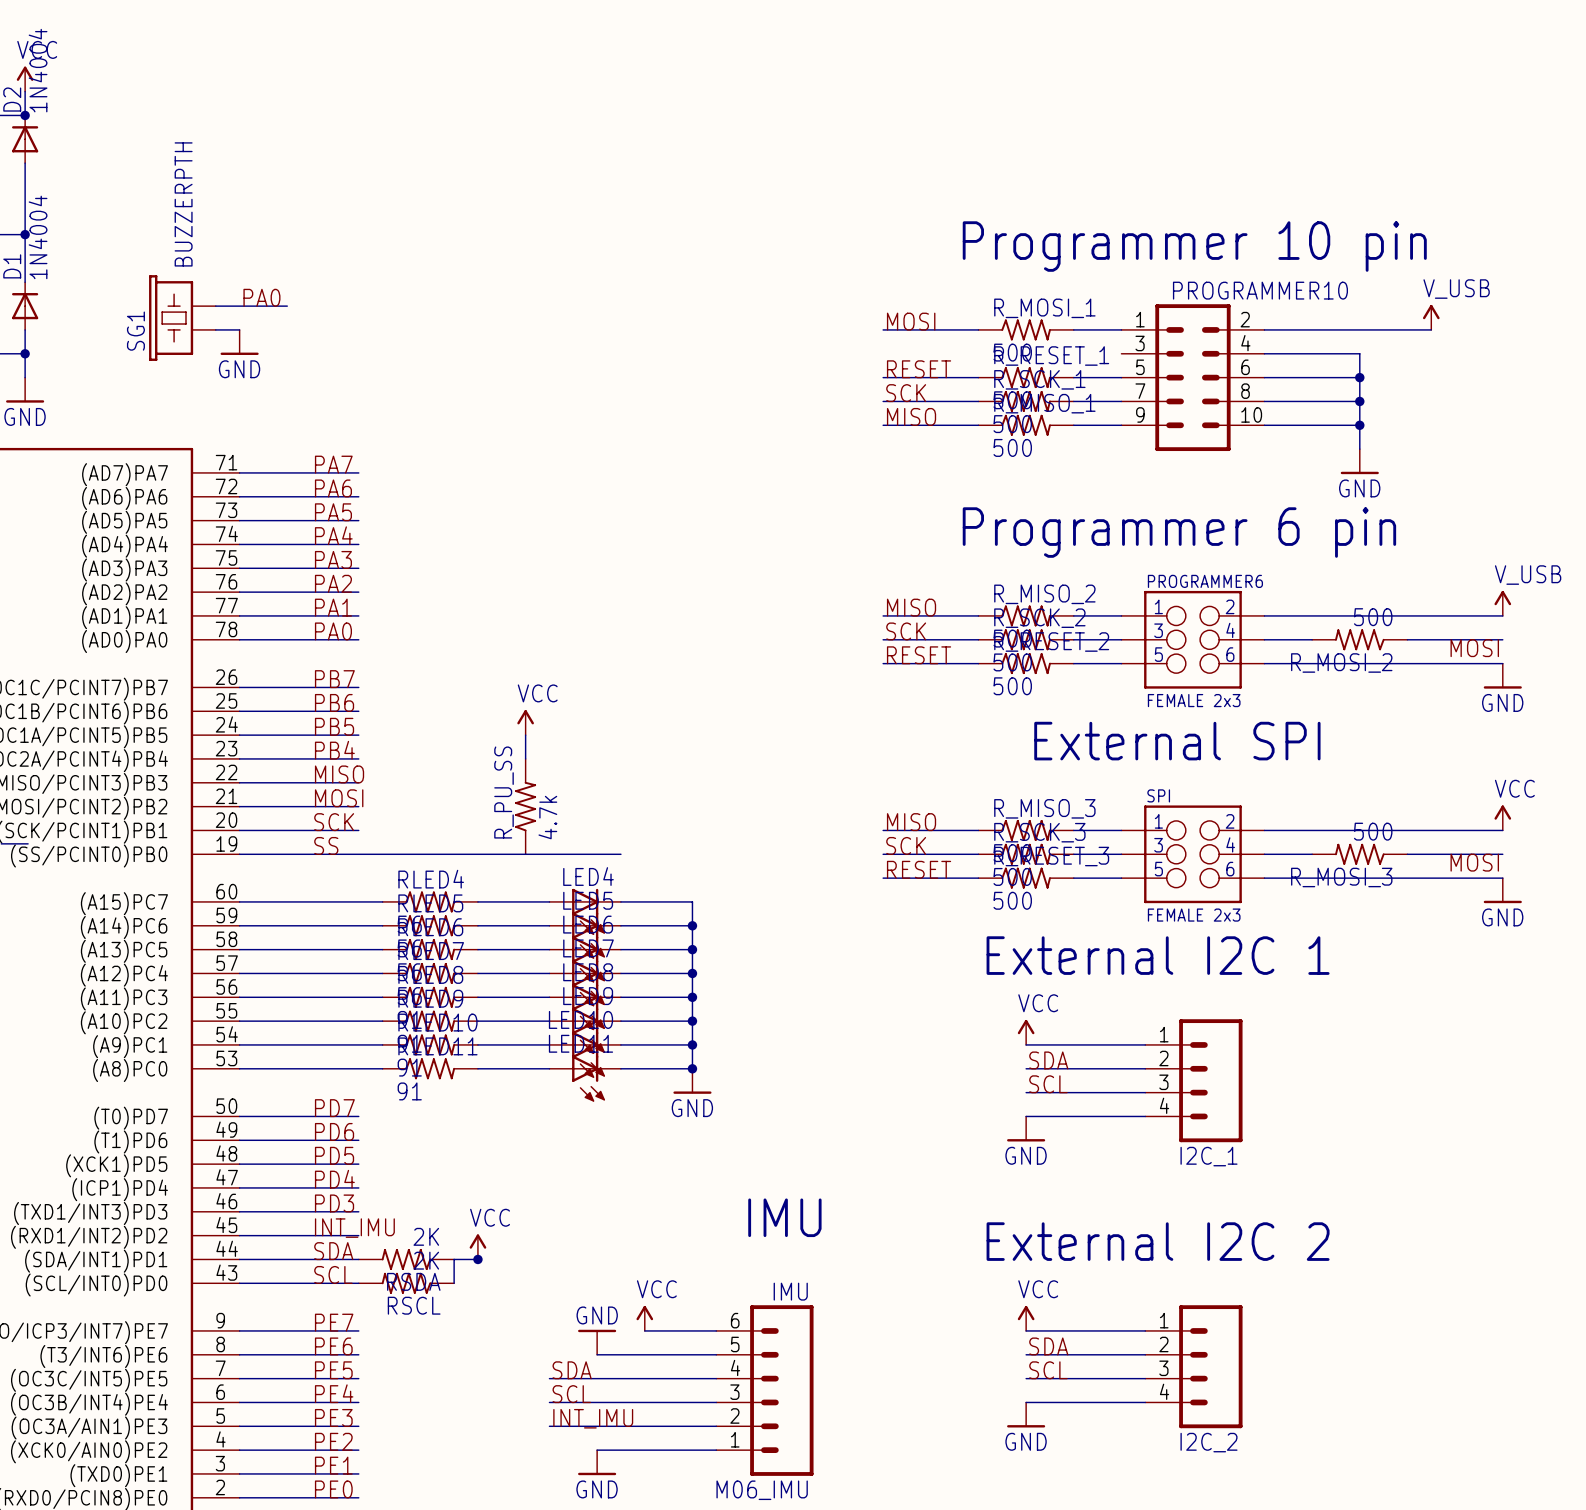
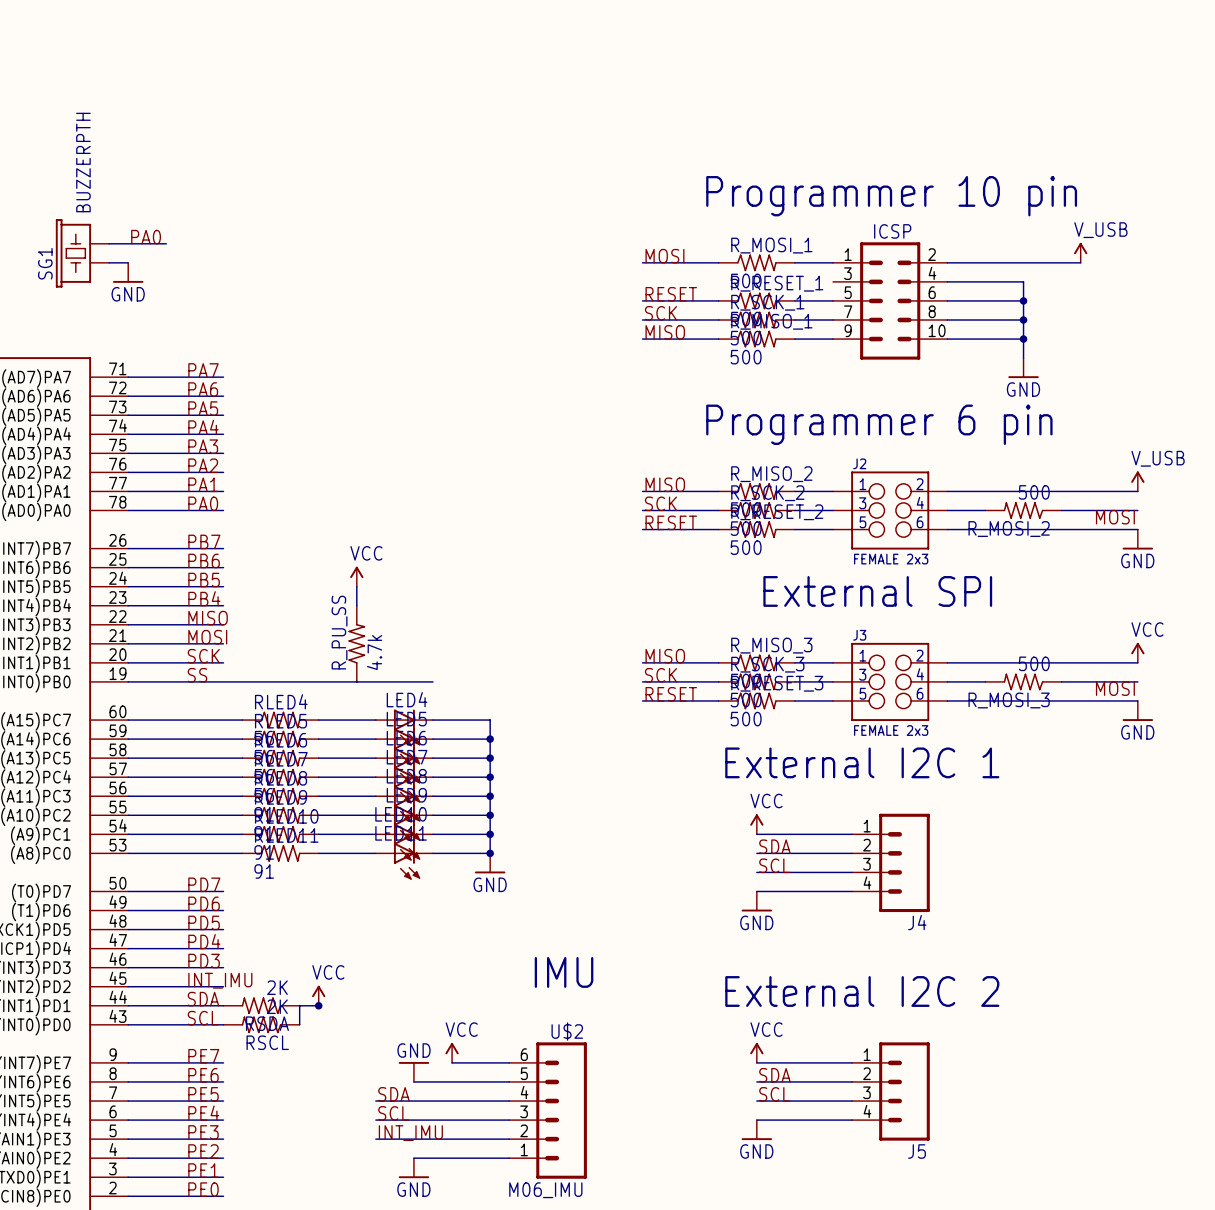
PROGRAMMER10 name: PROGRAMMER10 (1260, 290) -> ICSP (892, 231)
PROGRAMMER6 name: PROGRAMMER6 (1205, 581) -> J2 (859, 463)
SPI name: SPI (1158, 795) -> J3 (859, 635)
I2C_1 name: I2C_1 (1209, 1156) -> J4 (917, 922)
IMU name: IMU (790, 1291) -> U$2 (567, 1031)
I2C_2 name: I2C_2 (1209, 1442) -> J5 (917, 1151)

